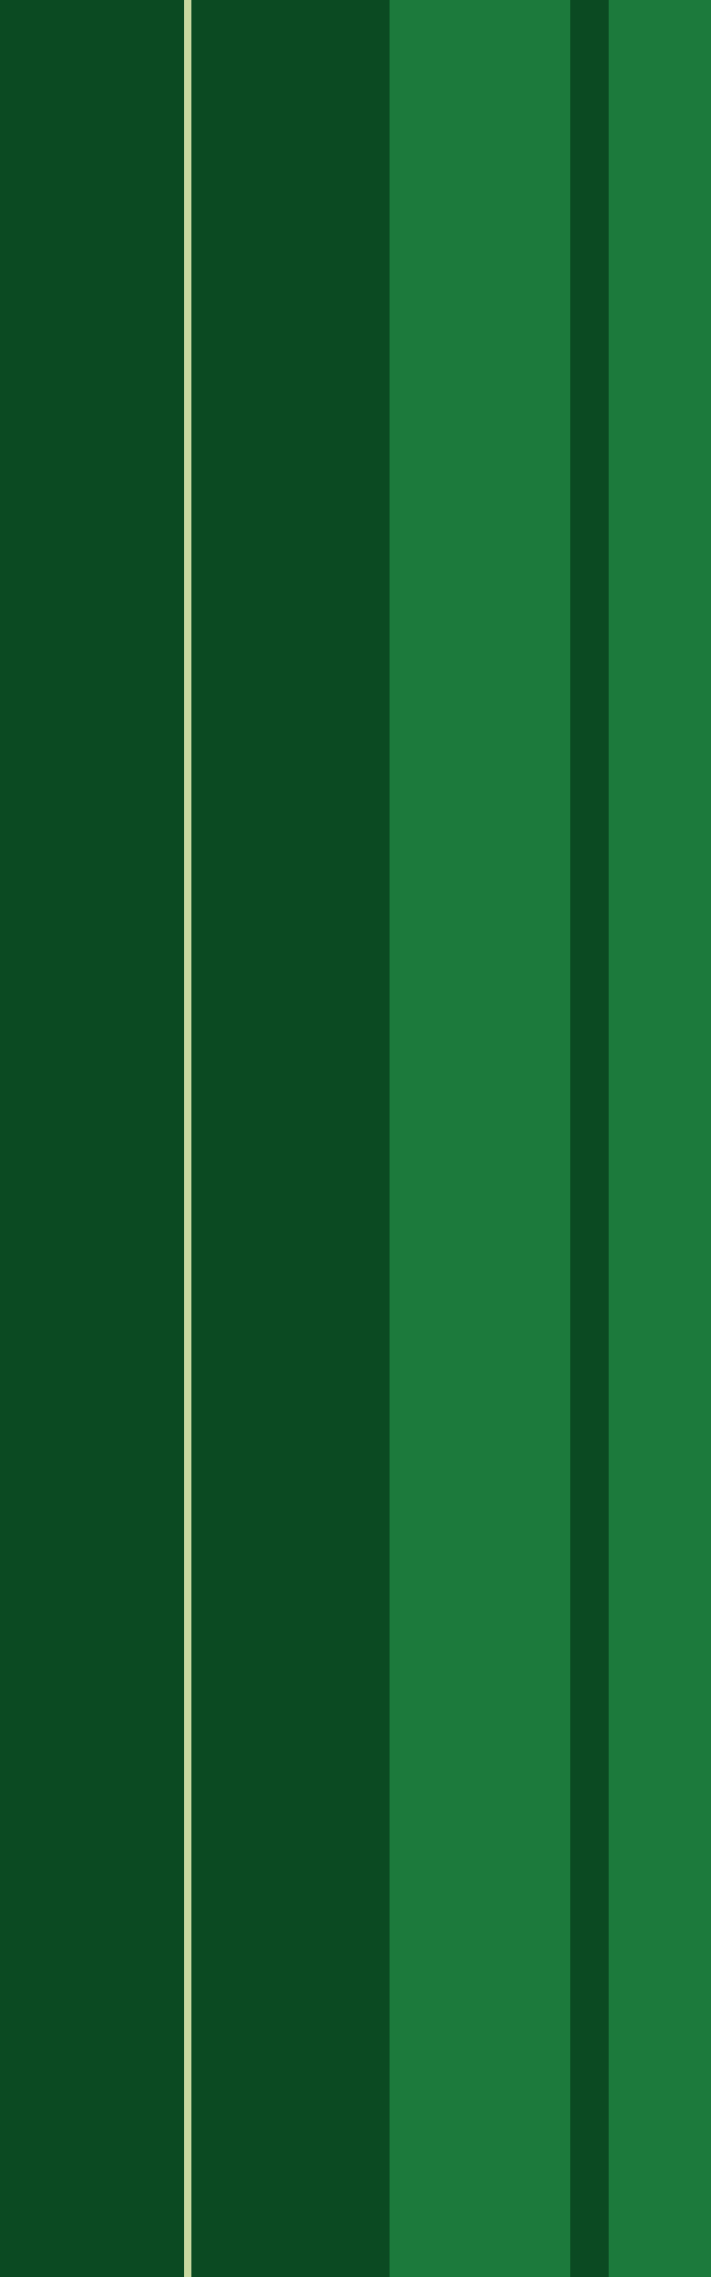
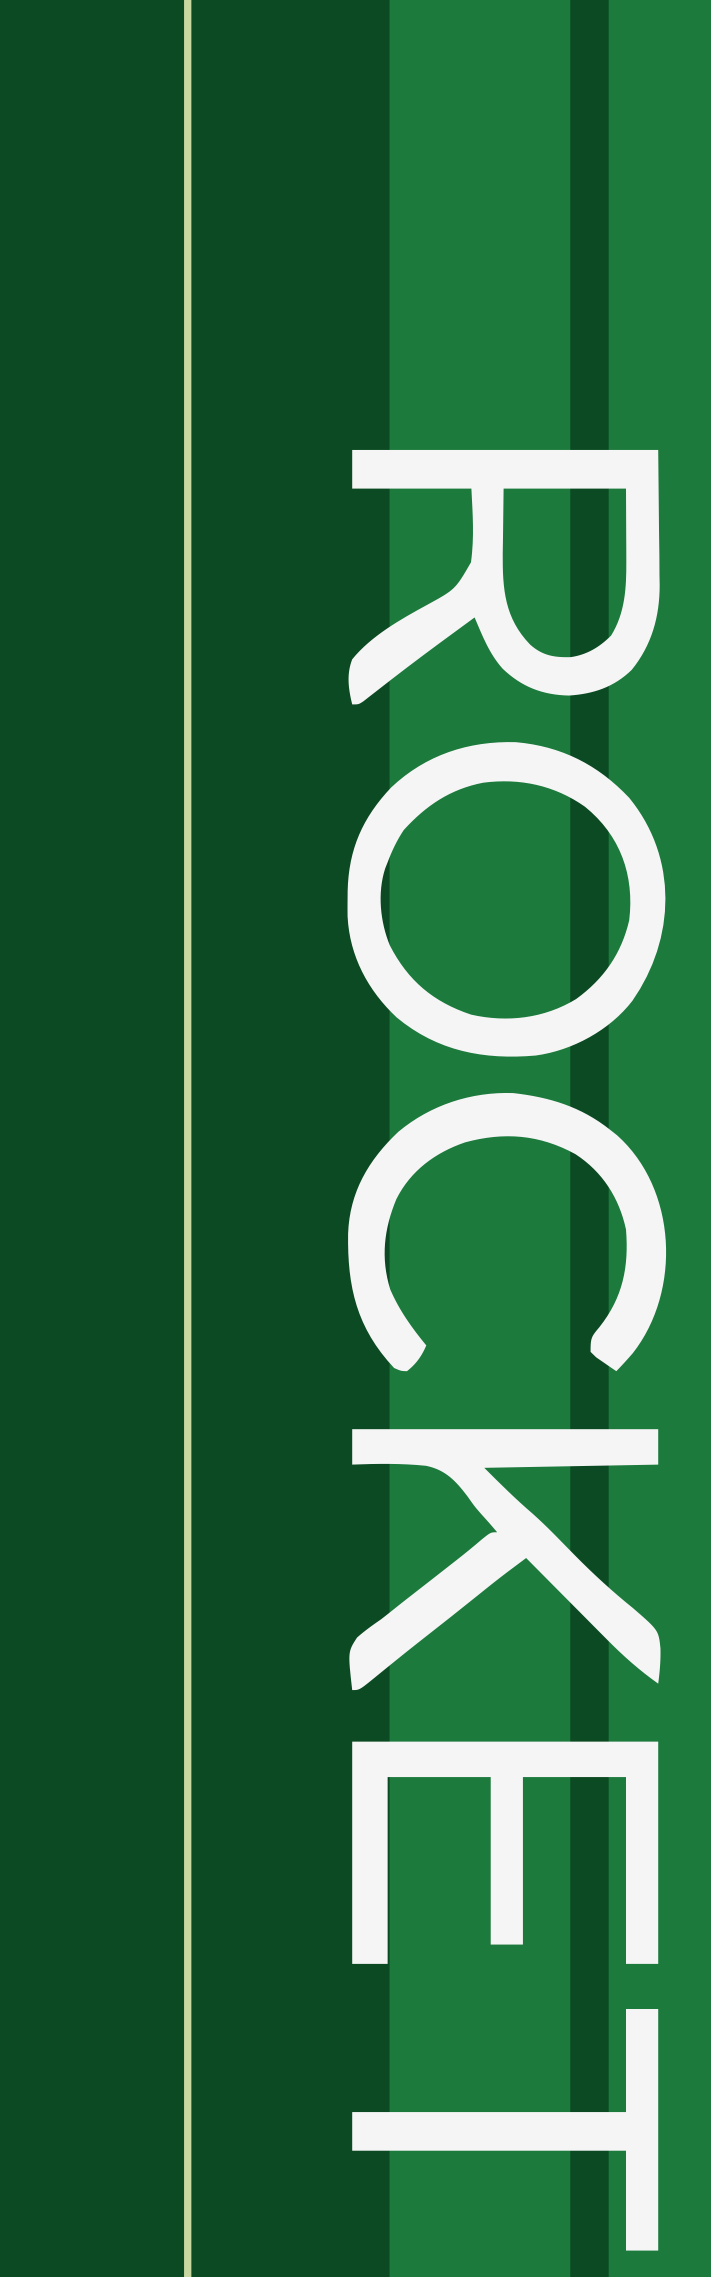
drawing: none -> [347, 449, 667, 2251]

